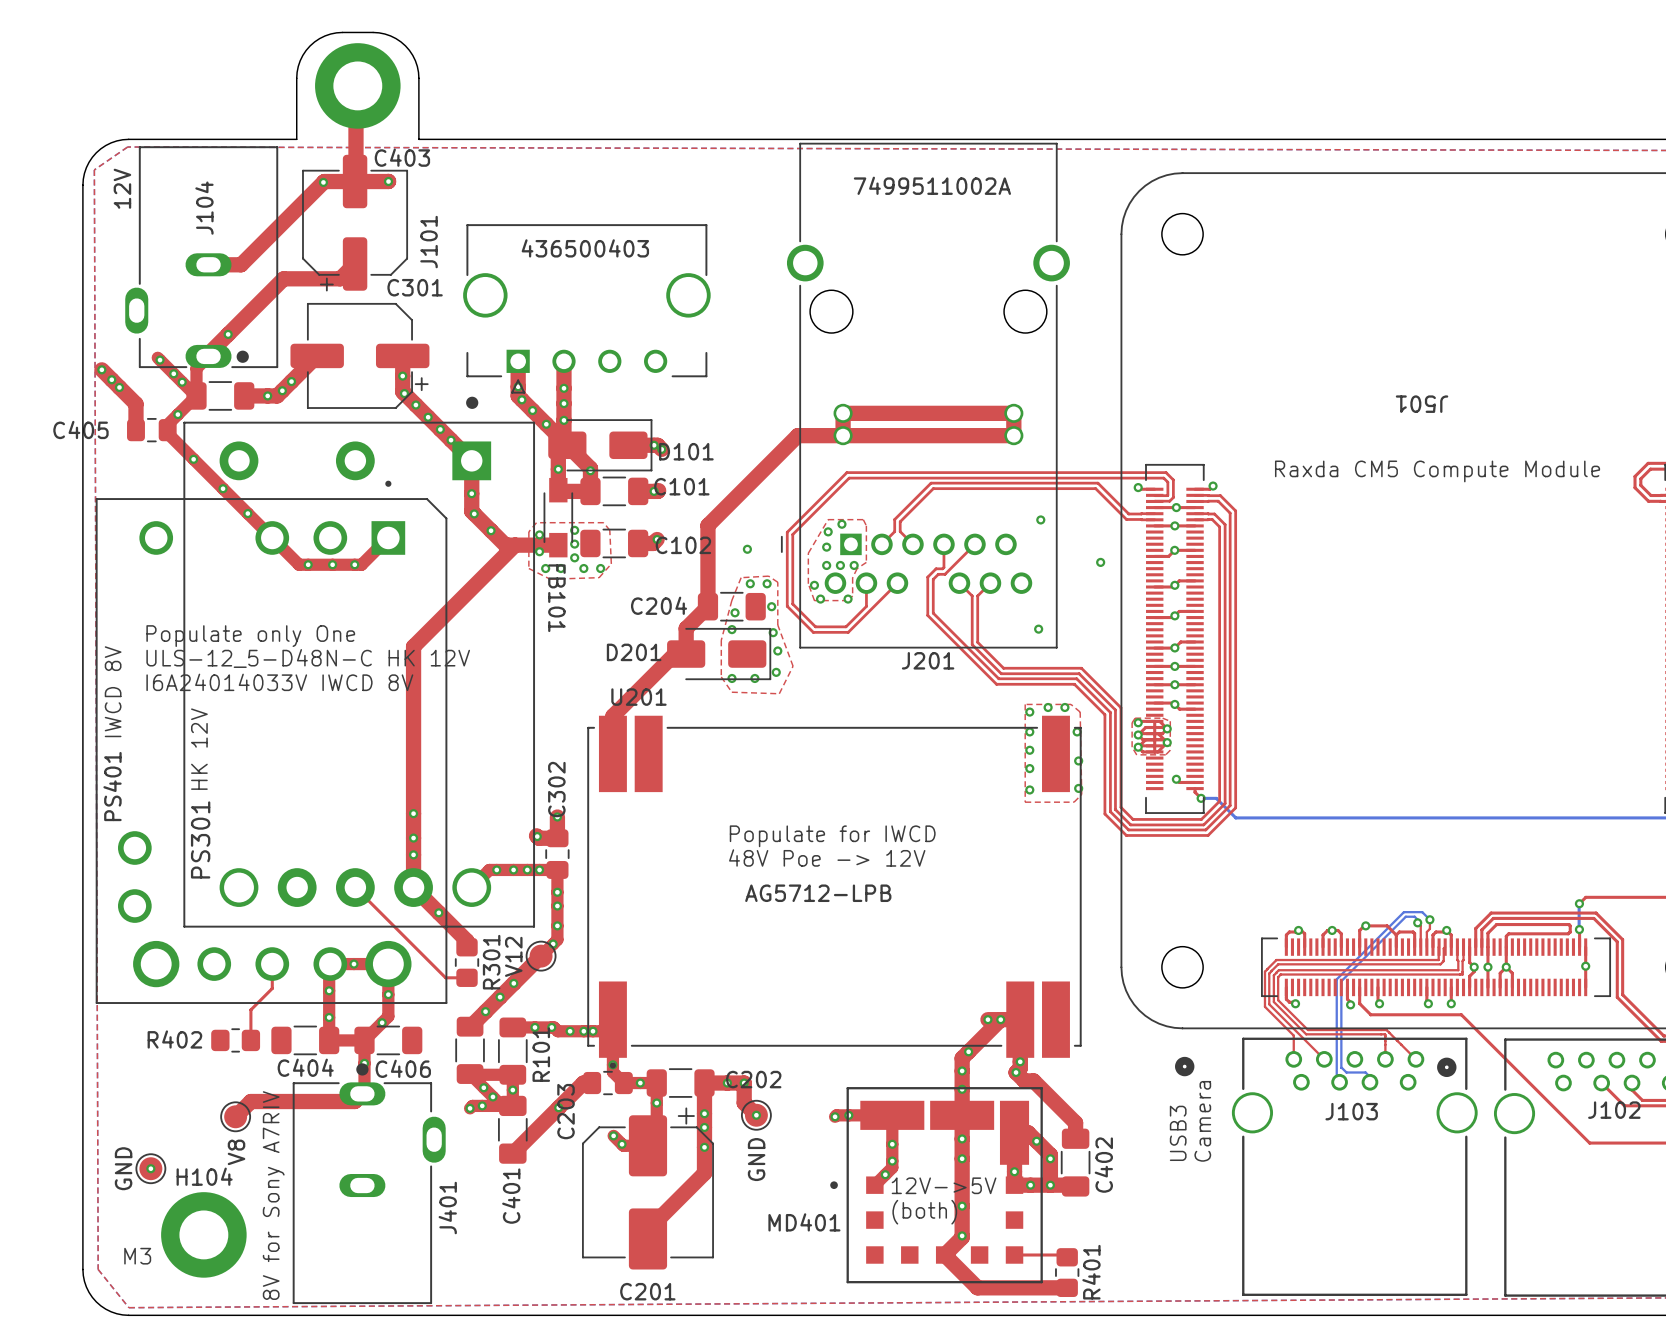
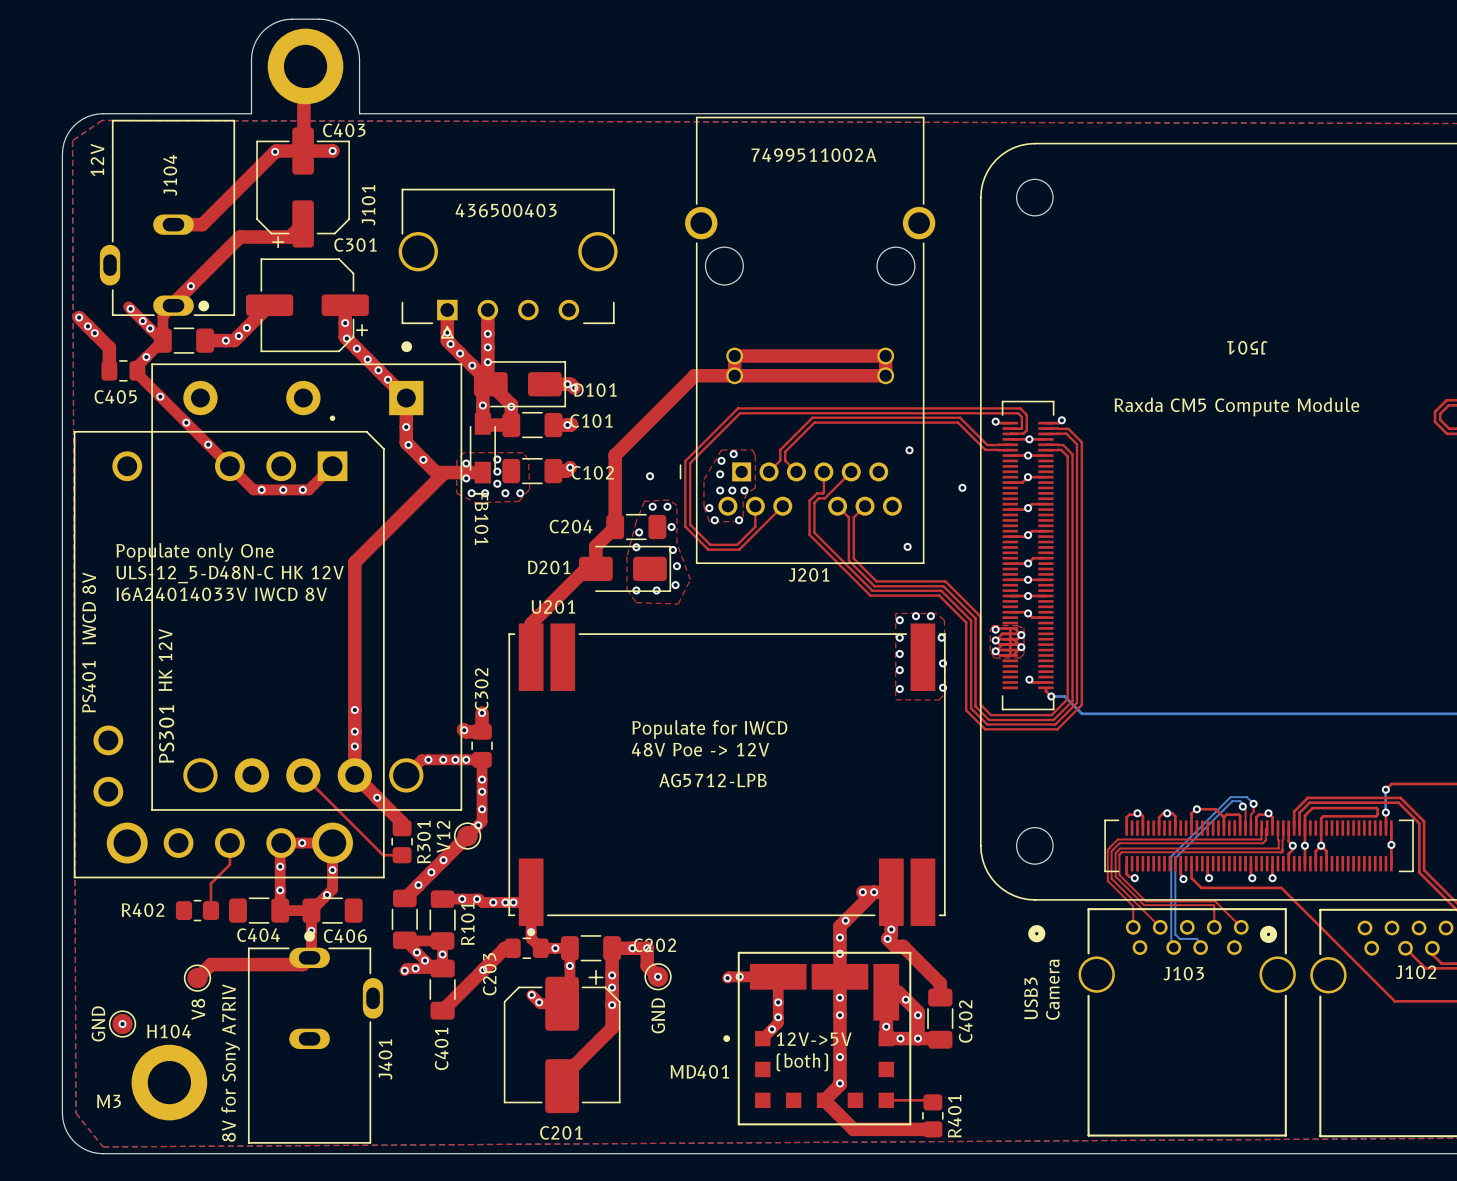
C405 name position: C405 (80, 429) -> C405 (115, 396)

